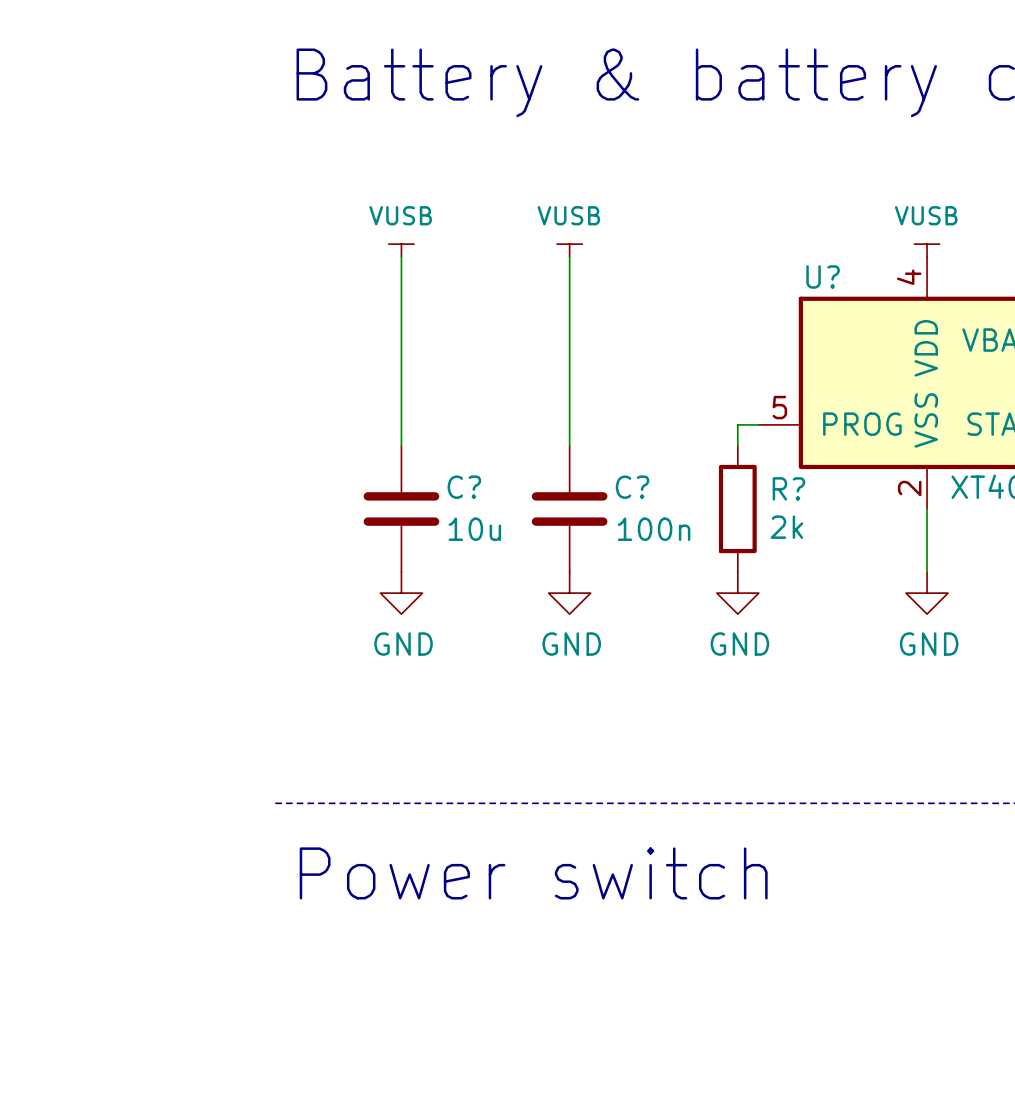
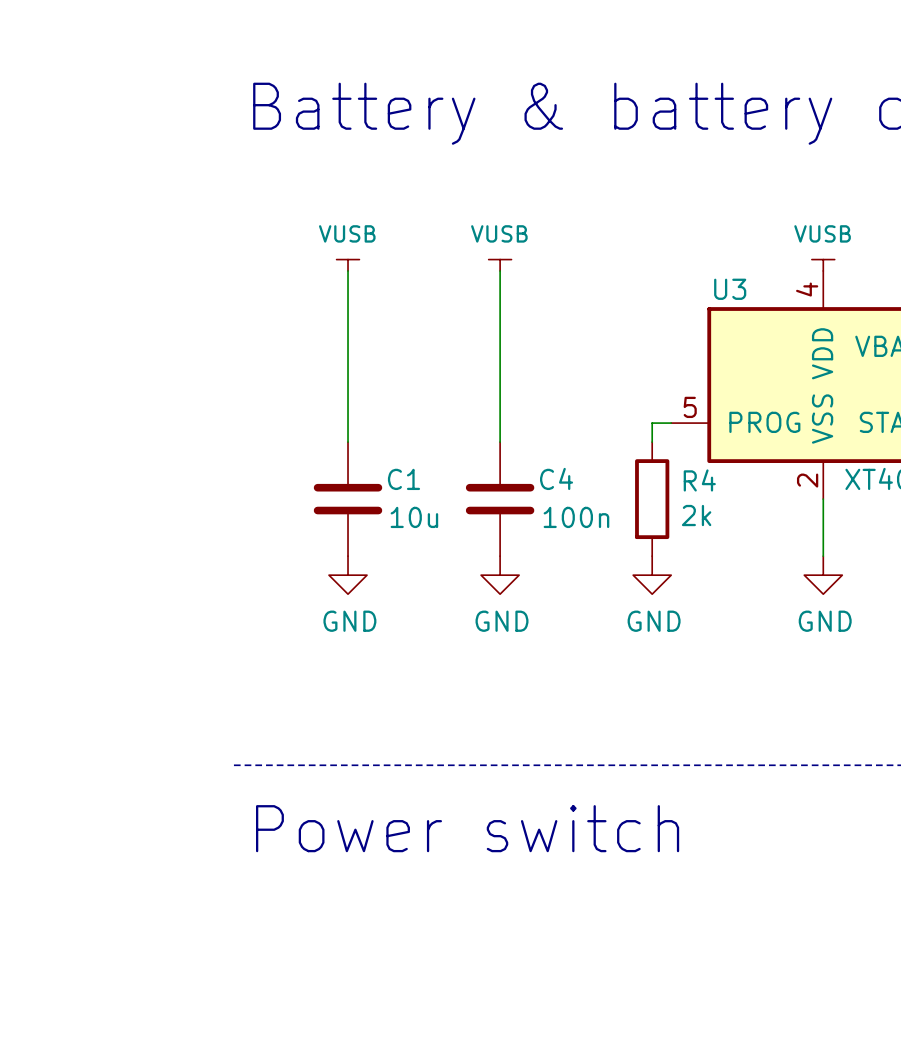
U? name: U? (823, 276) -> U3 (730, 289)
C? name: C? (464, 487) -> C1 (403, 479)
C? name: C? (632, 487) -> C4 (556, 478)
R? name: R? (788, 488) -> R4 (699, 480)

